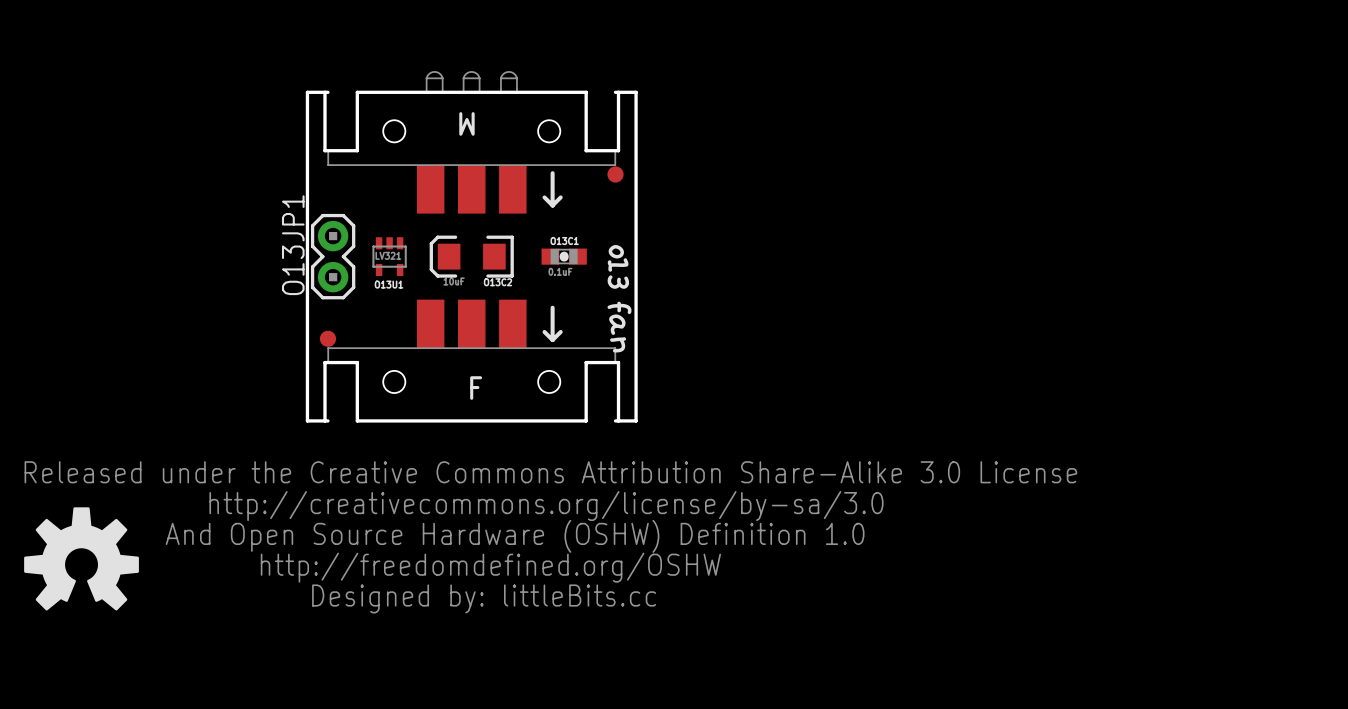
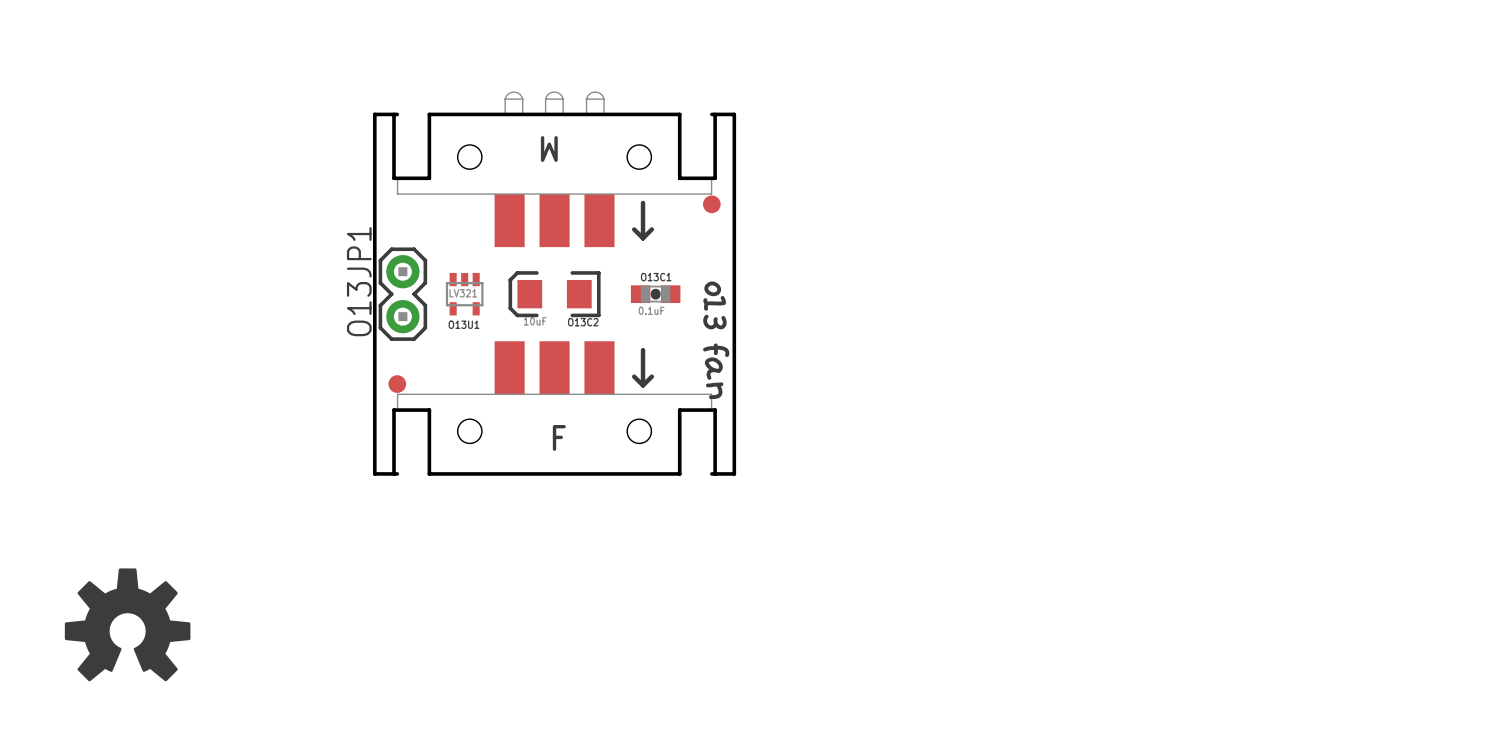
drawing: [24, 461, 1078, 614] -> none

